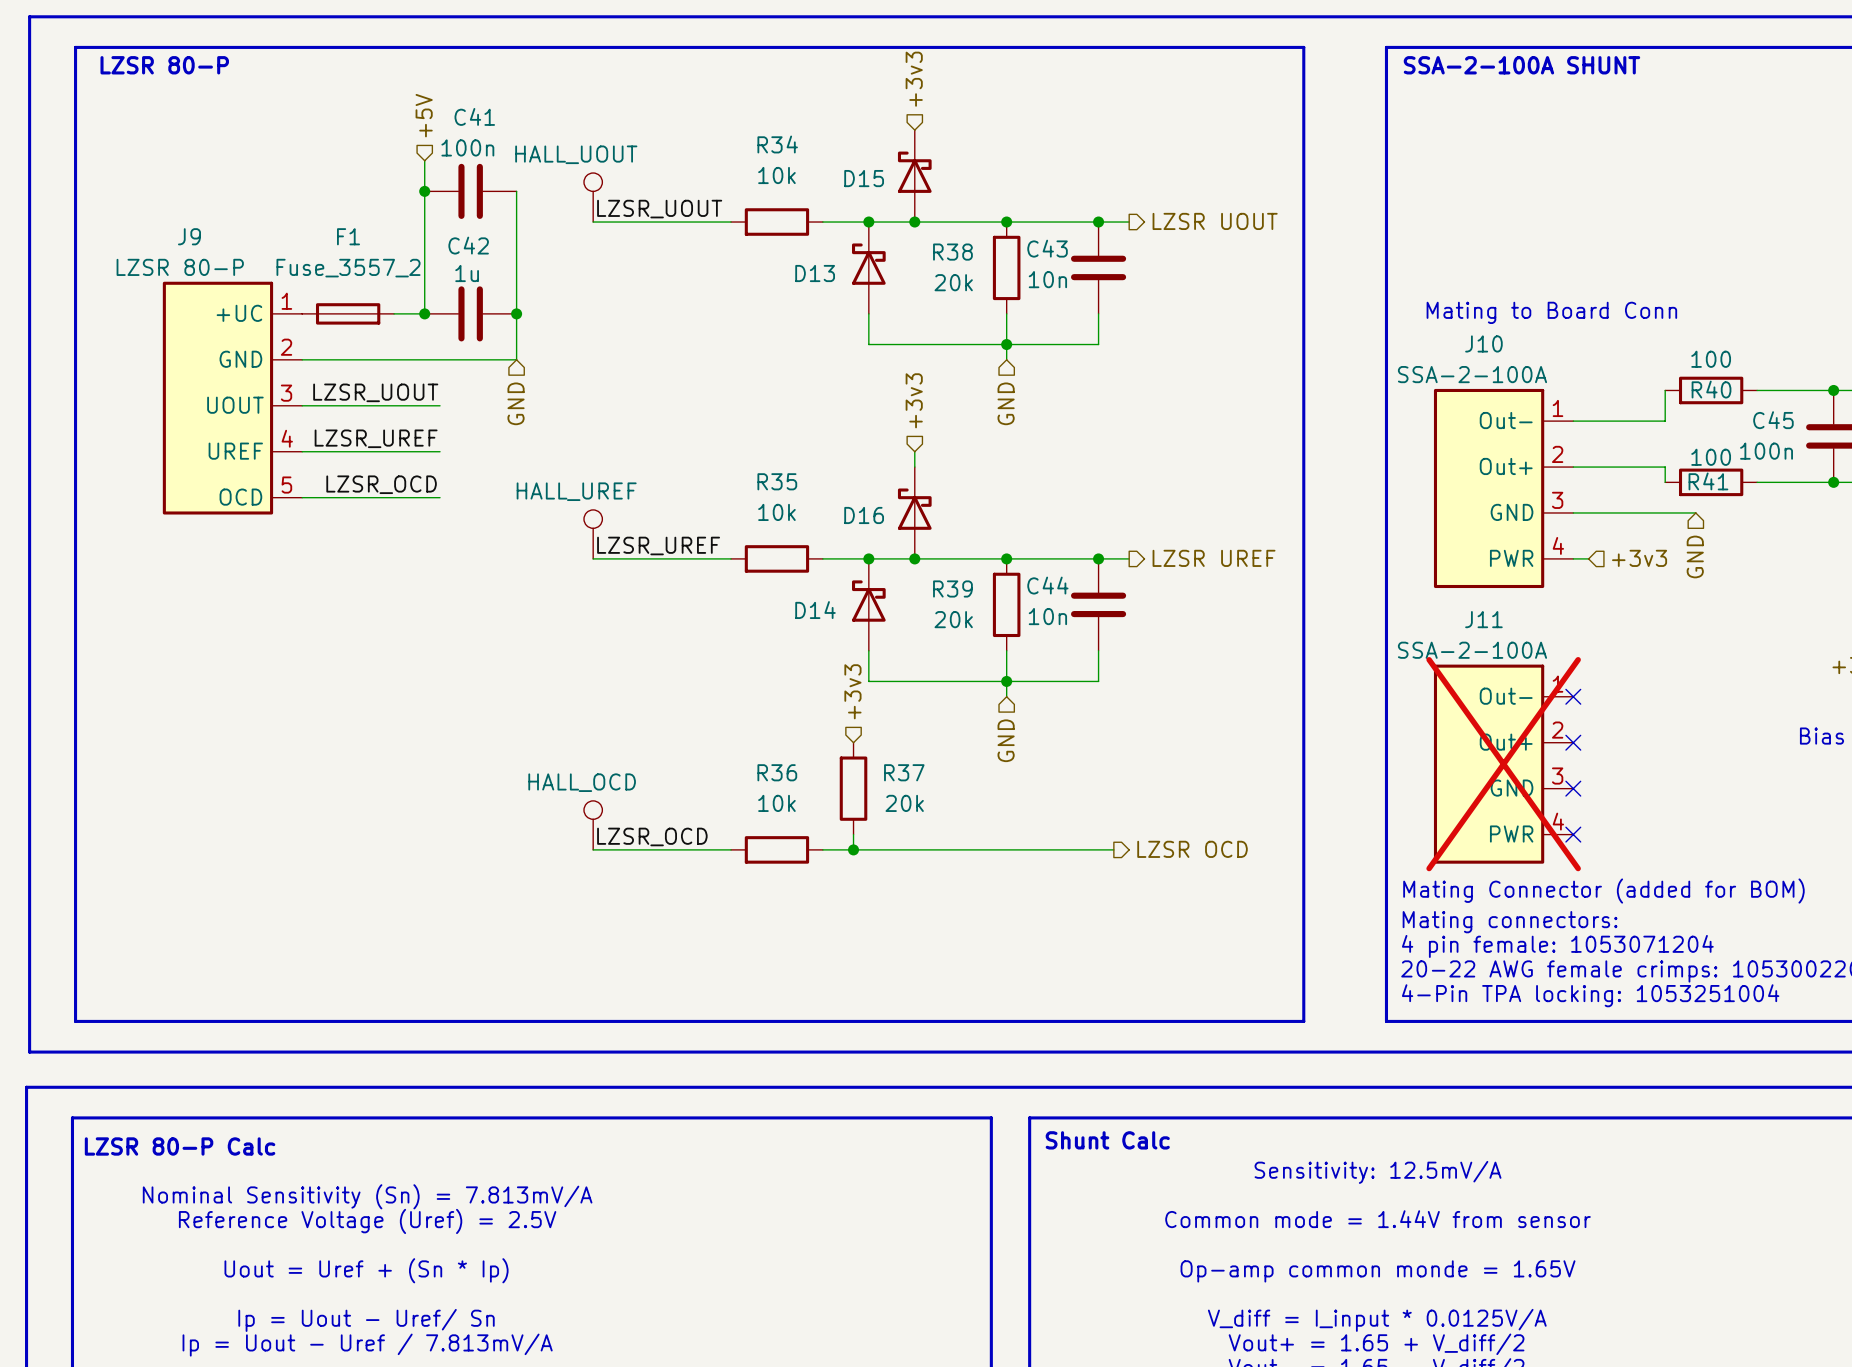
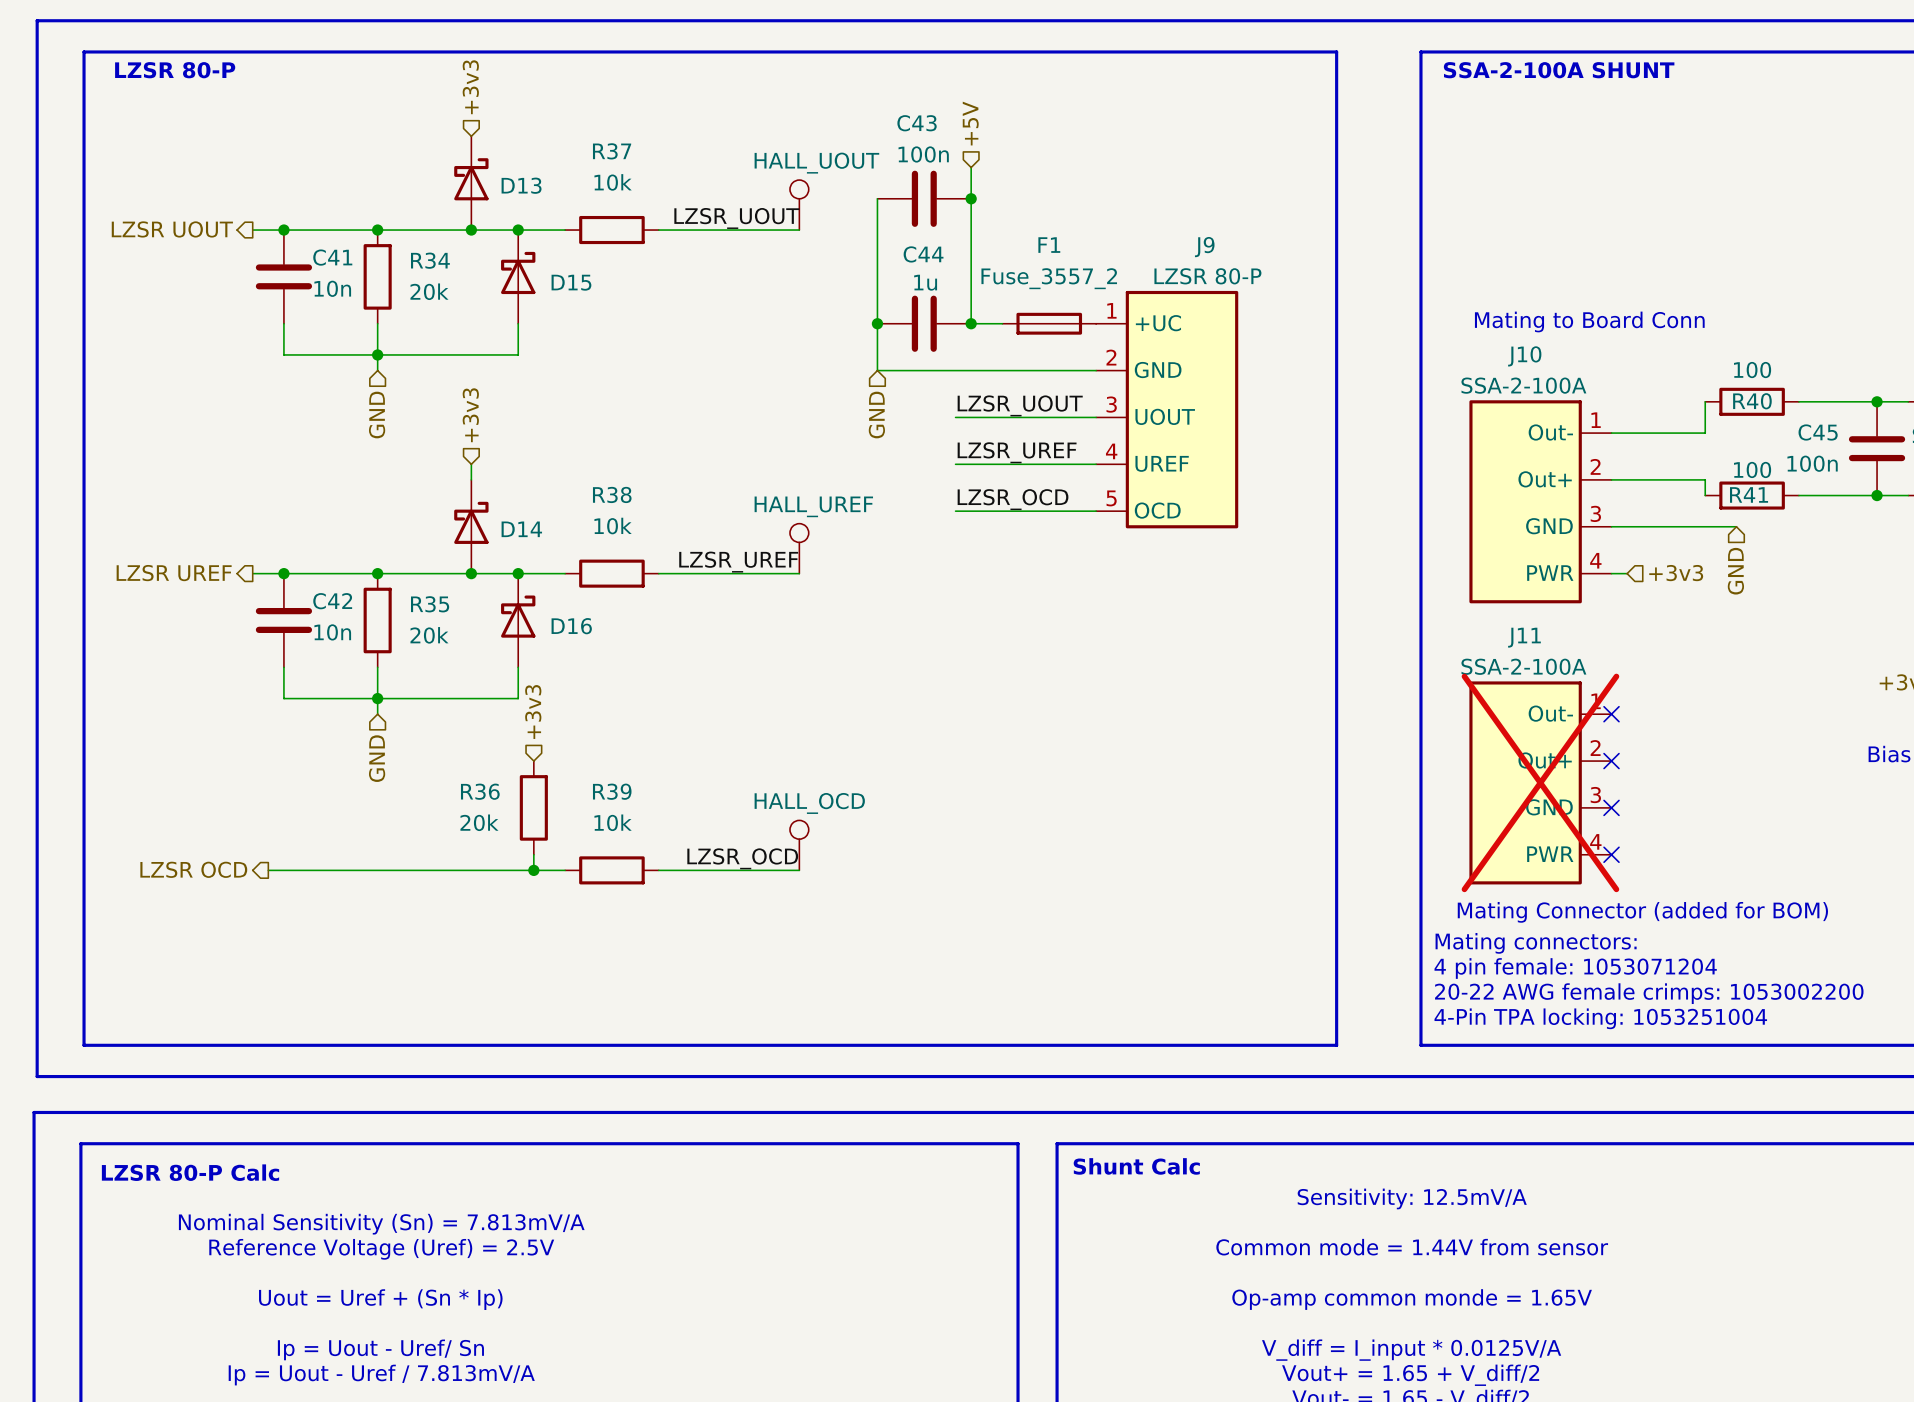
hierarchical label: none -> +3v3 (470, 87)
hierarchical label: +3v3 (914, 79) -> none
hierarchical label: +5V (424, 115) -> none
hierarchical label: none -> +5V (970, 123)
C41 name position: C41 (474, 116) -> C41 (332, 257)
R34 name position: R34 (777, 144) -> R34 (430, 260)
C41 value: 100n (467, 147) -> 10n (332, 288)
part value position: HALL_UOUT (576, 154) -> HALL_UOUT (816, 163)
wire: (424, 160) (424, 313) (394, 313) -> none
wire: none -> (971, 167) (971, 323) (1002, 323)
D15 flip: as is (914, 172) -> left-right (518, 272)
R34 value: 10k (776, 175) -> 20k (429, 291)
D15 position: (914, 176) -> (518, 276)
junction: (424, 191) -> none
C41 rotation: 0° (470, 191) -> 90° clockwise (283, 276)
C41 position: (470, 191) -> (283, 276)
wire: (516, 191) (516, 359) (302, 359) -> none
wire: none -> (877, 198) (877, 370) (1096, 370)
junction: none -> (971, 198)
part position: (593, 197) -> (799, 205)
label position: LZSR_UOUT (659, 209) -> LZSR_UOUT (736, 218)
hierarchical label: none -> LZSR UOUT (172, 229)
hierarchical label: LZSR UOUT (1215, 221) -> none
wire: none -> (252, 230) (565, 230)
junction: none -> (283, 230)
junction: none -> (377, 230)
junction: none -> (471, 230)
junction: none -> (518, 230)
wire: (593, 222) (639, 222) -> (752, 230) (799, 230)
R34 rotation: 0° (776, 222) -> 90° clockwise (377, 276)
R34 position: (776, 222) -> (377, 276)
wire: (822, 222) (1129, 222) -> none
junction: (868, 222) -> none
junction: (914, 222) -> none
junction: (1006, 222) -> none
junction: (1098, 222) -> none
C43 name position: C43 (1047, 248) -> C43 (917, 123)
R38 name position: R38 (952, 252) -> R38 (612, 494)
D13 flip: as is (868, 264) -> left-right (471, 179)
D13 position: (868, 267) -> (471, 183)
R38 rotation: 0° (1006, 267) -> 90° clockwise (611, 573)
R38 position: (1006, 267) -> (611, 573)
C43 rotation: 0° (1098, 267) -> 90° clockwise (924, 198)
C43 position: (1098, 267) -> (924, 198)
C42 value: 1u (467, 273) -> 10n (332, 632)
C43 value: 10n (1047, 279) -> 100n (923, 154)
R38 value: 20k (953, 282) -> 10k (613, 526)
wire: none -> (283, 323) (283, 354) (518, 354) (518, 323)
F1 position: (348, 313) -> (1049, 323)
wire: none -> (377, 323) (377, 370)
junction: (424, 313) -> none
C42 rotation: 0° (470, 313) -> 90° clockwise (283, 620)
C42 position: (470, 313) -> (283, 620)
junction: (516, 313) -> none
junction: none -> (877, 323)
wire: (868, 313) (868, 344) (1098, 344) (1098, 313) -> none
junction: none -> (971, 323)
wire: (1006, 313) (1006, 359) -> none
junction: none -> (377, 354)
junction: (1006, 344) -> none
label: LZSR_UOUT (375, 392) -> none
label: none -> LZSR_UOUT (1020, 405)
J9 flip: as is (217, 398) -> left-right (1182, 409)
J9 position: (232, 398) -> (1167, 409)
hierarchical label: none -> +3v3 (470, 415)
hierarchical label: +3v3 (914, 400) -> none
hierarchical label position: GND (516, 403) -> GND (377, 415)
hierarchical label position: GND (1006, 403) -> GND (876, 415)
wire: (302, 405) (440, 405) -> none
wire: none -> (955, 417) (1096, 417)
label: LZSR_UREF (376, 438) -> none
label: none -> LZSR_UREF (1017, 452)
wire: (302, 451) (440, 451) -> none
wire: none -> (471, 464) (471, 479)
wire: (914, 451) (914, 467) -> none
wire: none -> (955, 464) (1096, 464)
R35 name position: R35 (777, 481) -> R35 (430, 604)
label: LZSR_OCD (381, 484) -> none
label: none -> LZSR_OCD (1013, 499)
part value position: HALL_UREF (576, 491) -> HALL_UREF (813, 506)
wire: (302, 497) (440, 497) -> none
wire: none -> (955, 511) (1096, 511)
D16 flip: as is (914, 509) -> left-right (518, 616)
R35 value: 10k (776, 512) -> 20k (429, 635)
D16 position: (914, 512) -> (518, 620)
part position: (593, 534) -> (799, 548)
label position: LZSR_UREF (658, 545) -> LZSR_UREF (738, 562)
hierarchical label: none -> LZSR UREF (174, 573)
wire: none -> (252, 573) (565, 573)
junction: none -> (283, 573)
junction: none -> (377, 573)
junction: none -> (471, 573)
junction: none -> (518, 573)
wire: (593, 558) (639, 558) -> (752, 573) (799, 573)
R35 rotation: 0° (776, 558) -> 90° clockwise (377, 620)
R35 position: (776, 558) -> (377, 620)
wire: (822, 558) (1129, 558) -> none
junction: (868, 558) -> none
junction: (914, 558) -> none
junction: (1006, 558) -> none
junction: (1098, 558) -> none
hierarchical label: LZSR UREF (1214, 558) -> none
R39 name position: R39 (952, 588) -> R39 (612, 791)
D14 flip: as is (868, 601) -> left-right (471, 522)
D14 position: (868, 604) -> (471, 526)
R39 rotation: 0° (1006, 604) -> 90° clockwise (611, 870)
R39 position: (1006, 604) -> (611, 870)
C44 rotation: 0° (1098, 604) -> 90° clockwise (924, 323)
C44 position: (1098, 604) -> (924, 323)
C44 value: 10n (1047, 616) -> 1u (925, 282)
R39 value: 20k (953, 619) -> 10k (613, 822)
wire: none -> (283, 667) (283, 698) (518, 698) (518, 667)
wire: none -> (377, 667) (377, 714)
wire: (868, 650) (868, 681) (1098, 681) (1098, 650) -> none
wire: (1006, 650) (1006, 696) -> none
junction: none -> (377, 698)
junction: (1006, 681) -> none
hierarchical label: none -> +3v3 (533, 712)
hierarchical label: +3v3 (852, 691) -> none
hierarchical label: none -> GND (377, 758)
hierarchical label: GND (1006, 740) -> none
R36 name position: R36 (777, 772) -> R36 (480, 791)
R37 name position: R37 (904, 772) -> R37 (612, 151)
part value position: HALL_OCD (582, 782) -> HALL_OCD (809, 803)
R37 rotation: 0° (853, 788) -> 90° clockwise (611, 230)
R37 position: (853, 788) -> (611, 230)
R36 value: 10k (776, 803) -> 20k (479, 822)
R37 value: 20k (904, 803) -> 10k (613, 182)
part position: (593, 825) -> (799, 845)
wire: none -> (533, 854) (533, 870)
wire: (853, 834) (853, 849) -> none
label position: LZSR_OCD (652, 836) -> LZSR_OCD (742, 858)
hierarchical label: none -> LZSR OCD (193, 869)
wire: none -> (268, 870) (565, 870)
junction: none -> (533, 870)
wire: (593, 849) (639, 849) -> (752, 870) (799, 870)
R36 rotation: 0° (776, 849) -> 90° clockwise (533, 807)
R36 position: (776, 849) -> (533, 807)
wire: (822, 849) (1113, 849) -> none
junction: (853, 849) -> none
hierarchical label: LZSR OCD (1192, 849) -> none

